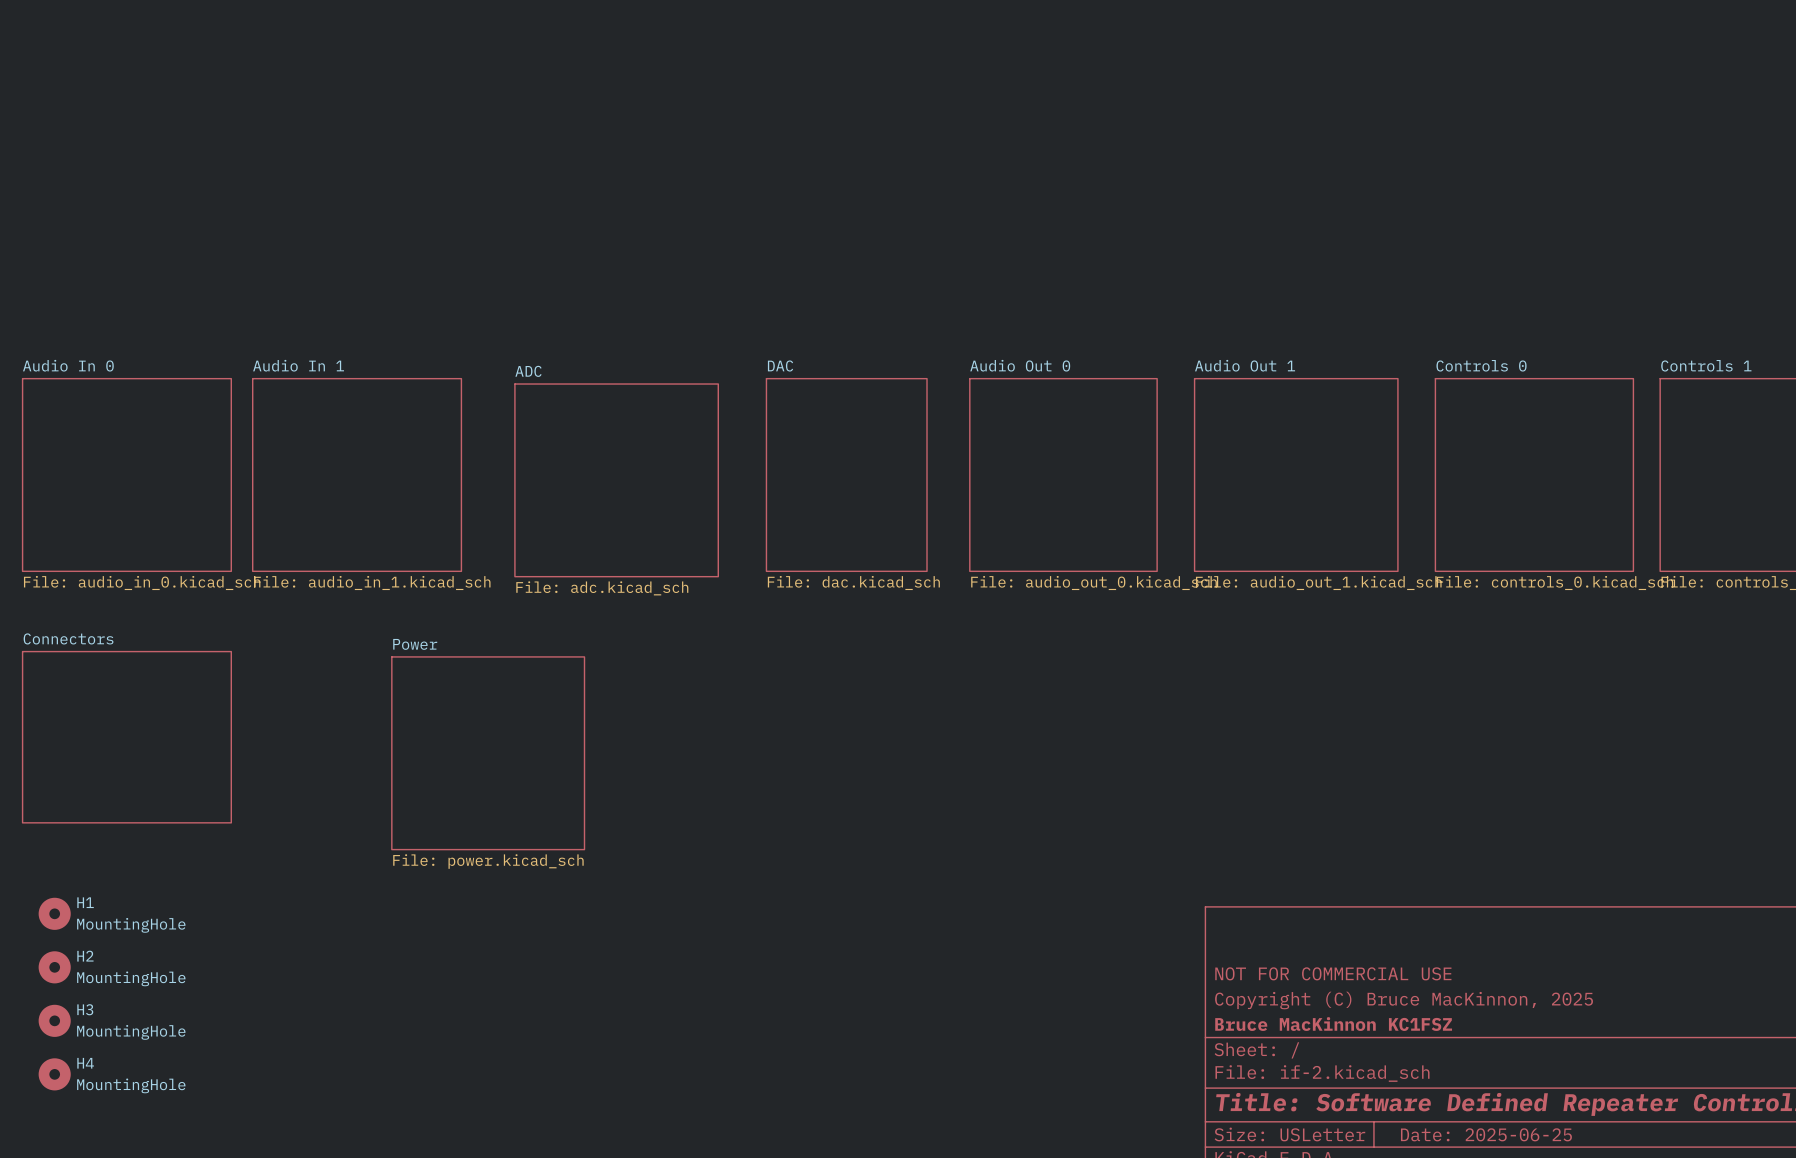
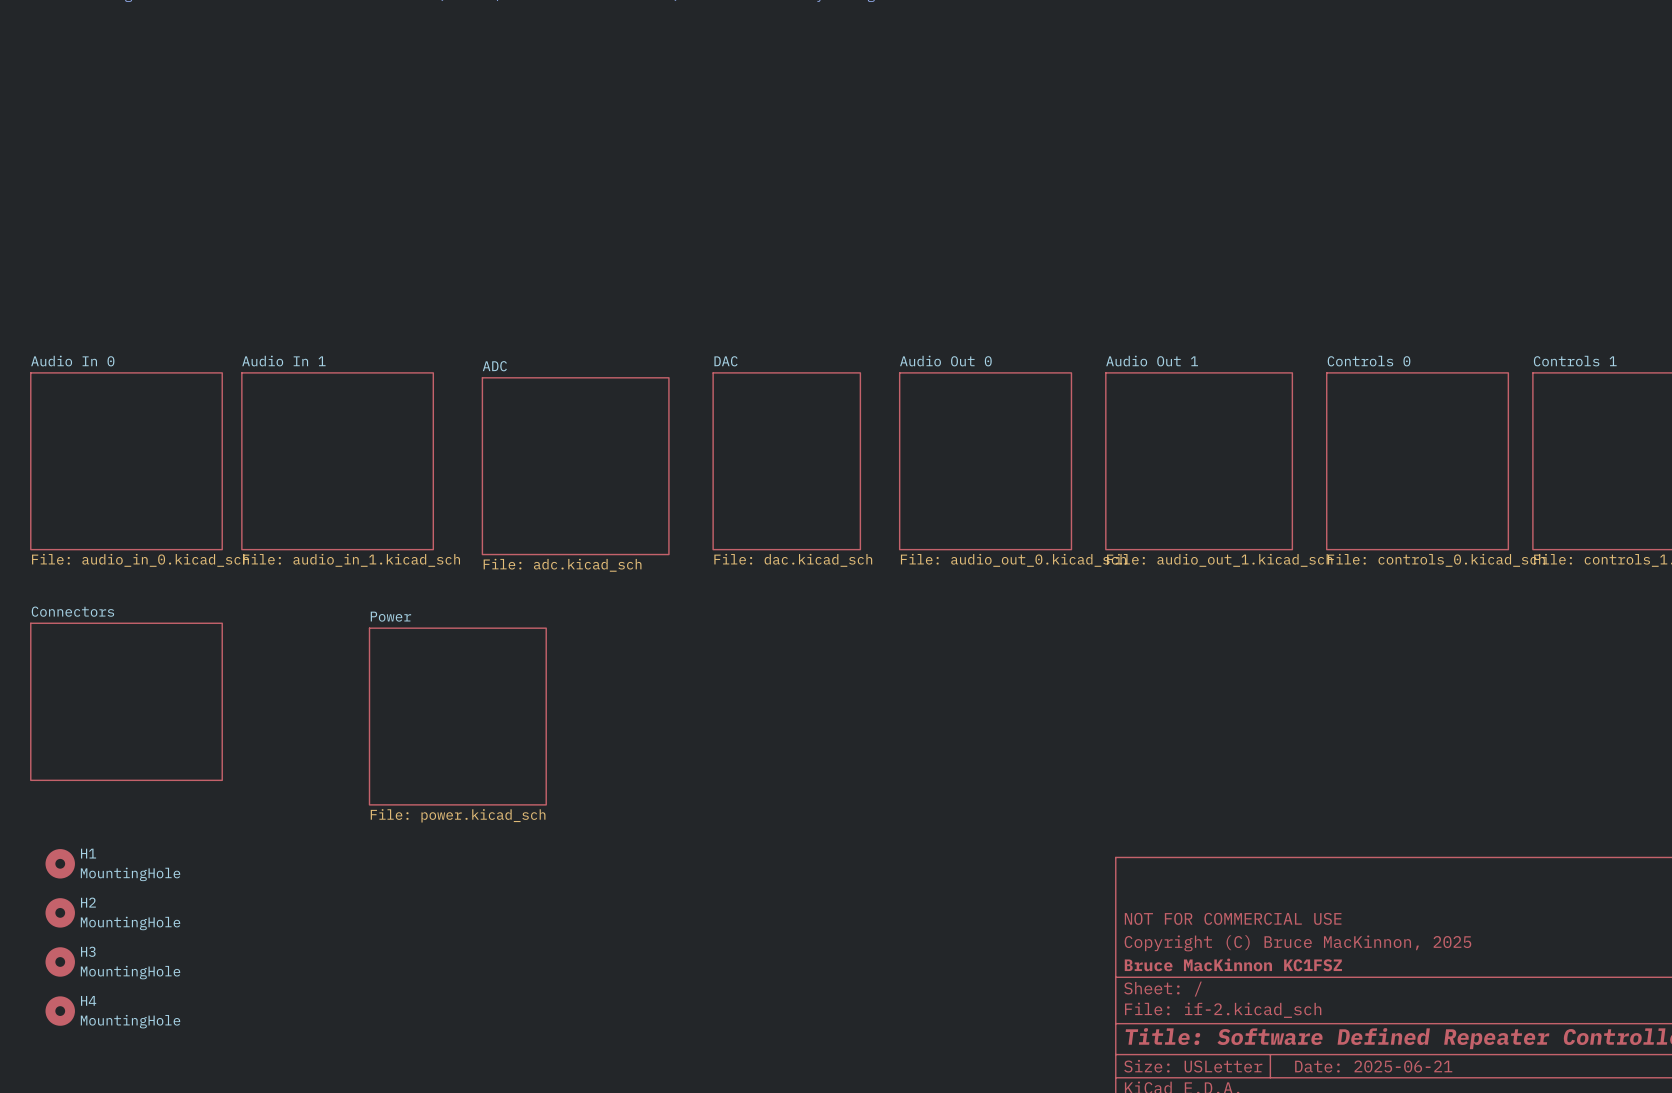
title block: Date: 2025-06-25 (1486, 1134) -> Date: 2025-06-21 (1373, 1066)

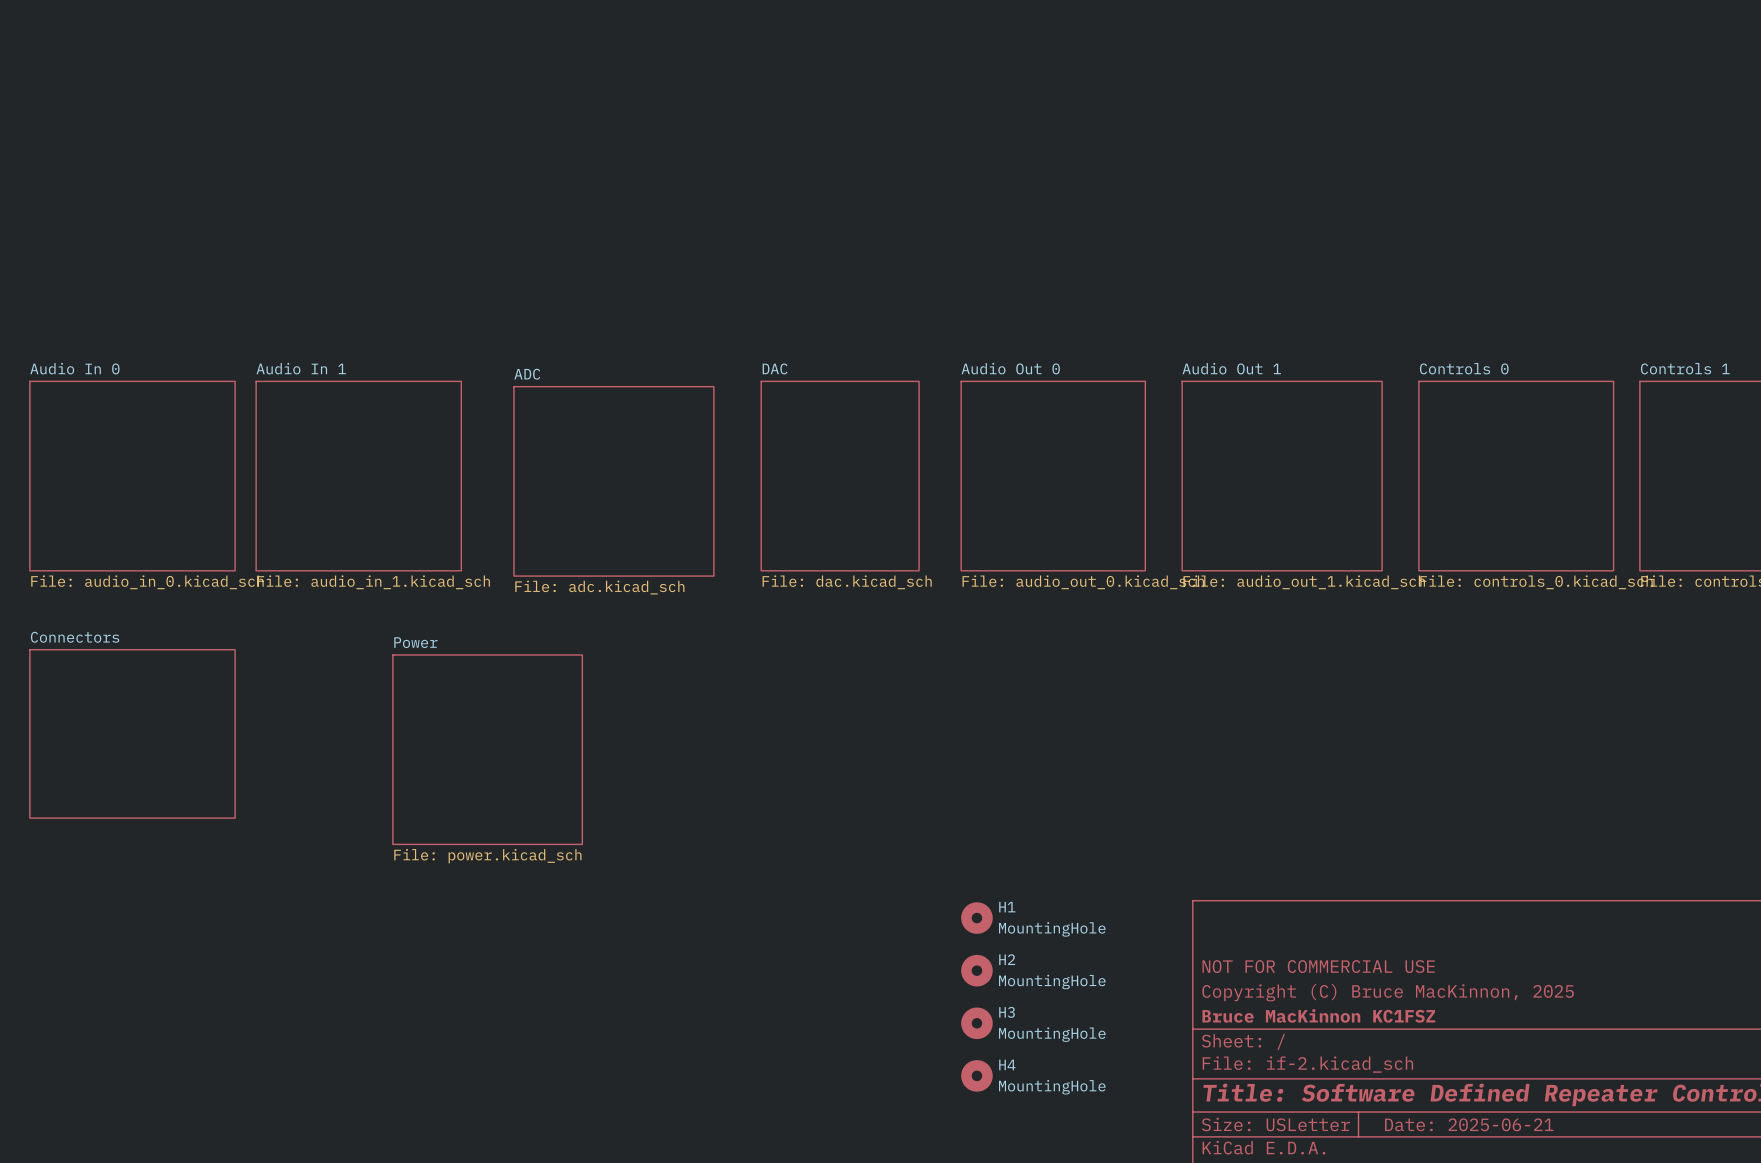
H1 position: (60, 863) -> (976, 918)
H2 position: (60, 912) -> (976, 970)
H3 position: (60, 961) -> (976, 1023)
H4 position: (60, 1011) -> (976, 1075)

